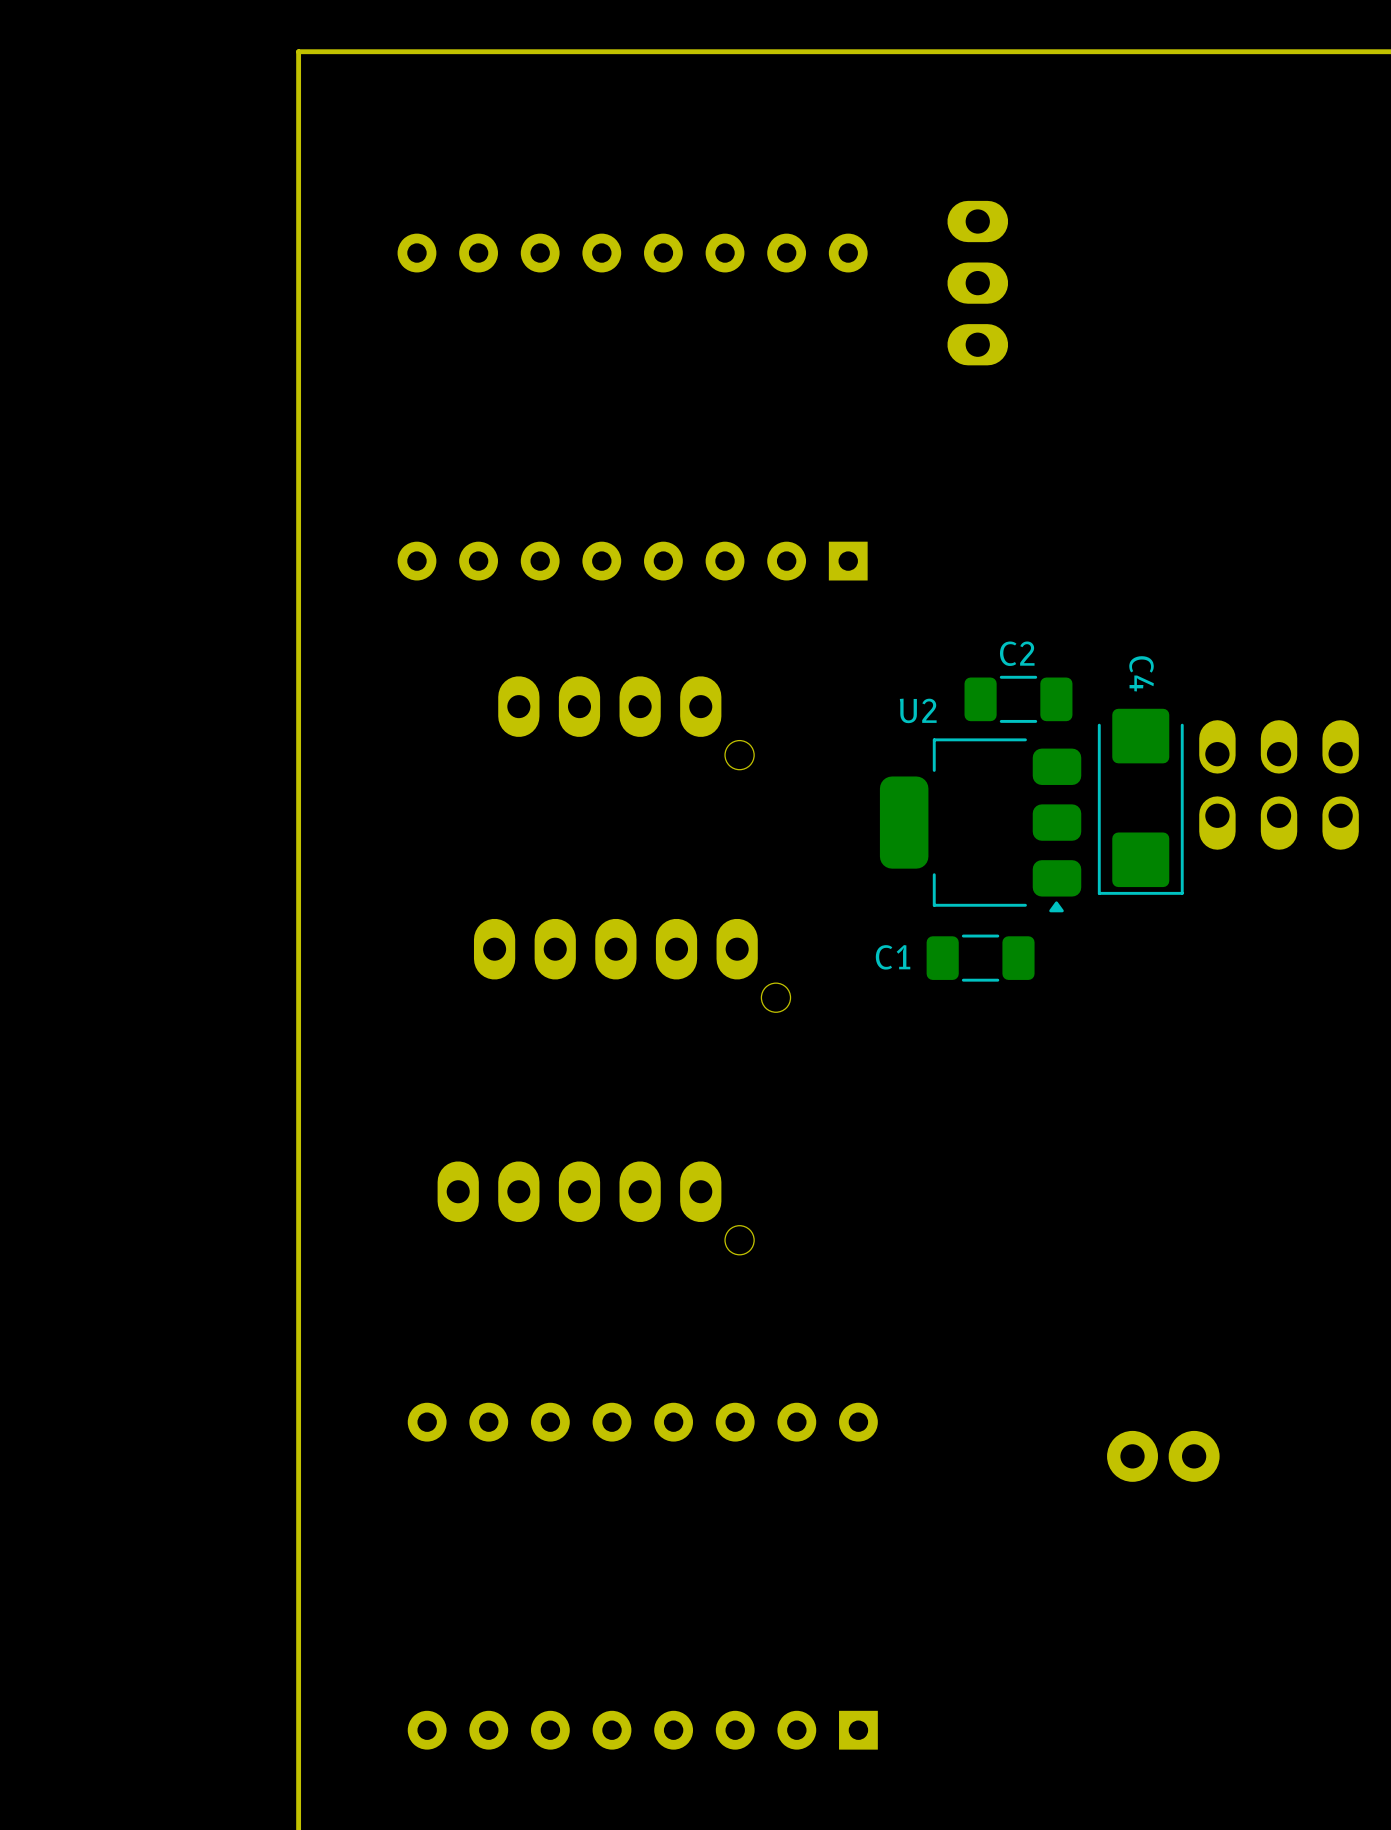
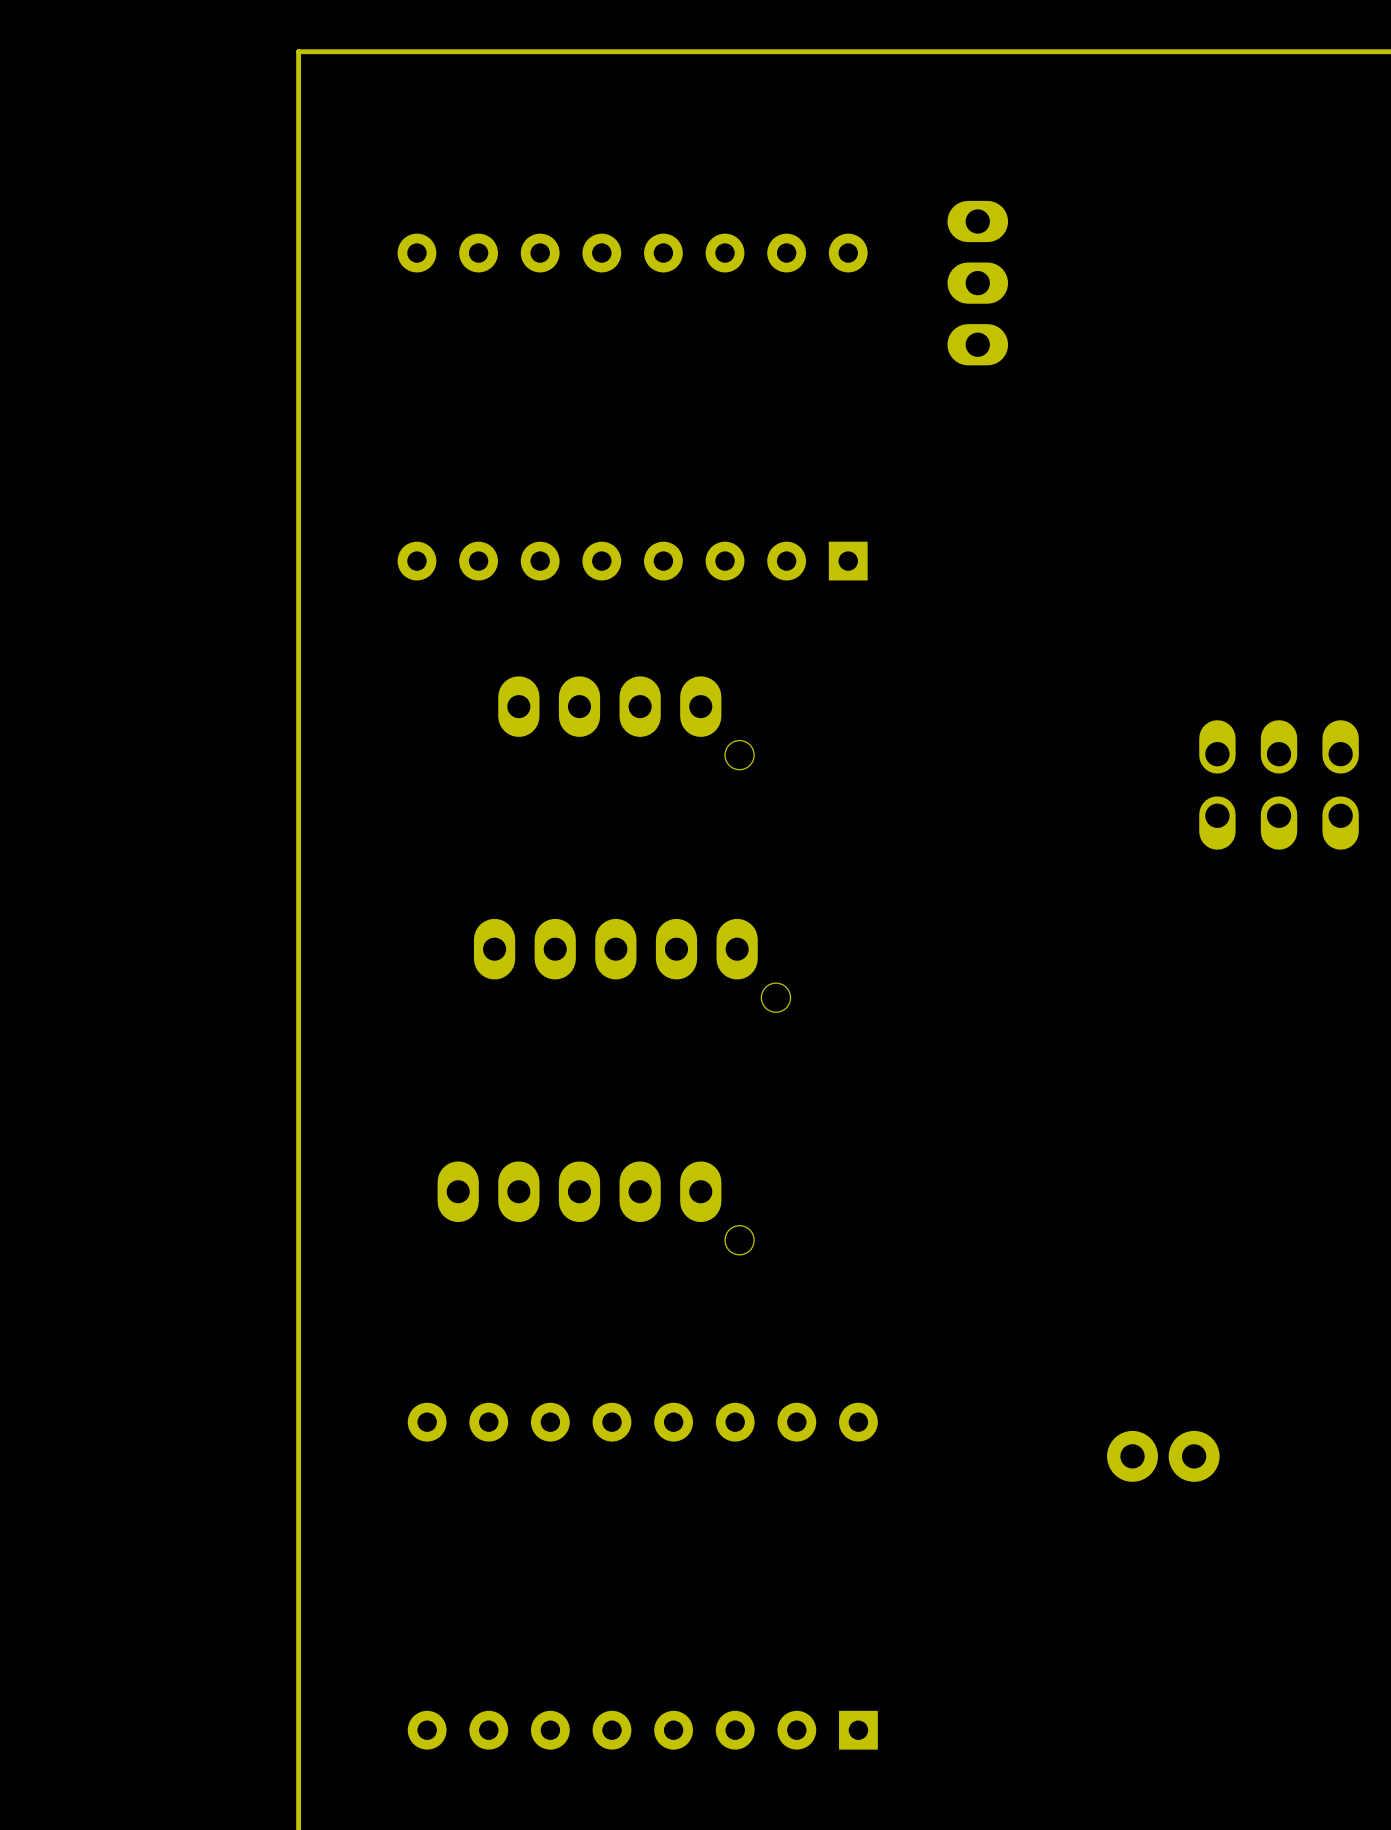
C2: (1018, 699) -> none
C4: (1140, 801) -> none
U2: (980, 825) -> none
C1: (980, 958) -> none

